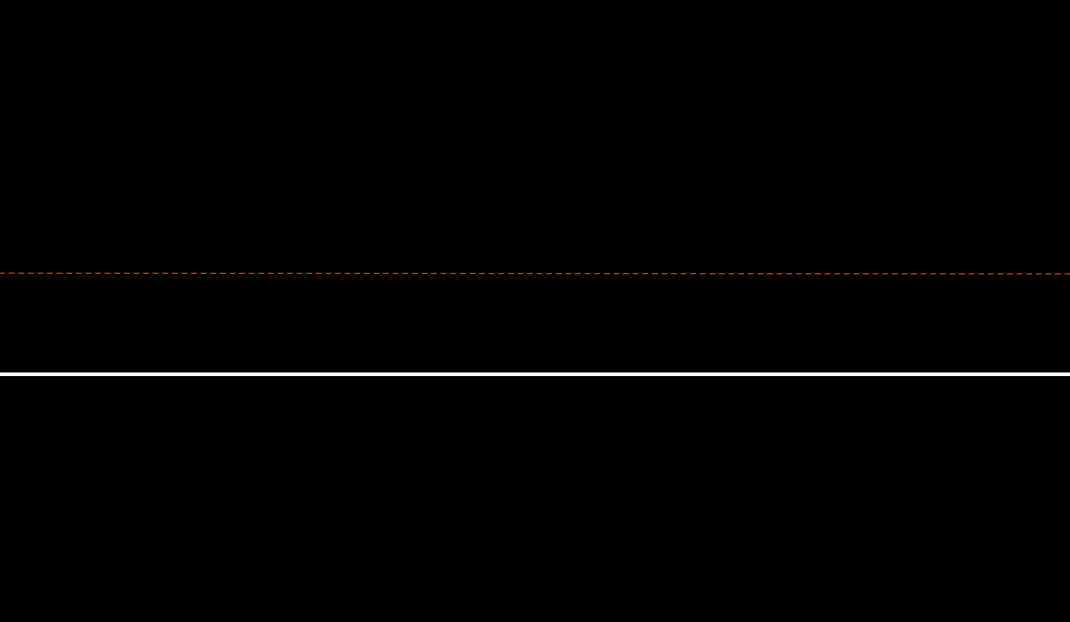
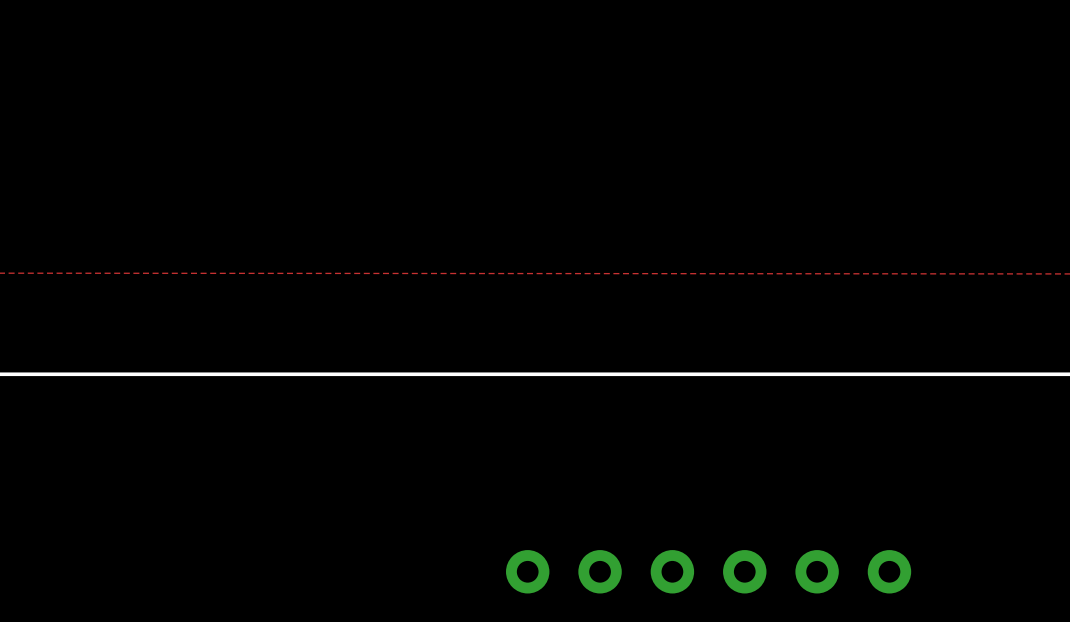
via: none -> (527, 571)
via: none -> (600, 571)
via: none -> (672, 571)
via: none -> (744, 571)
via: none -> (817, 571)
via: none -> (889, 571)

